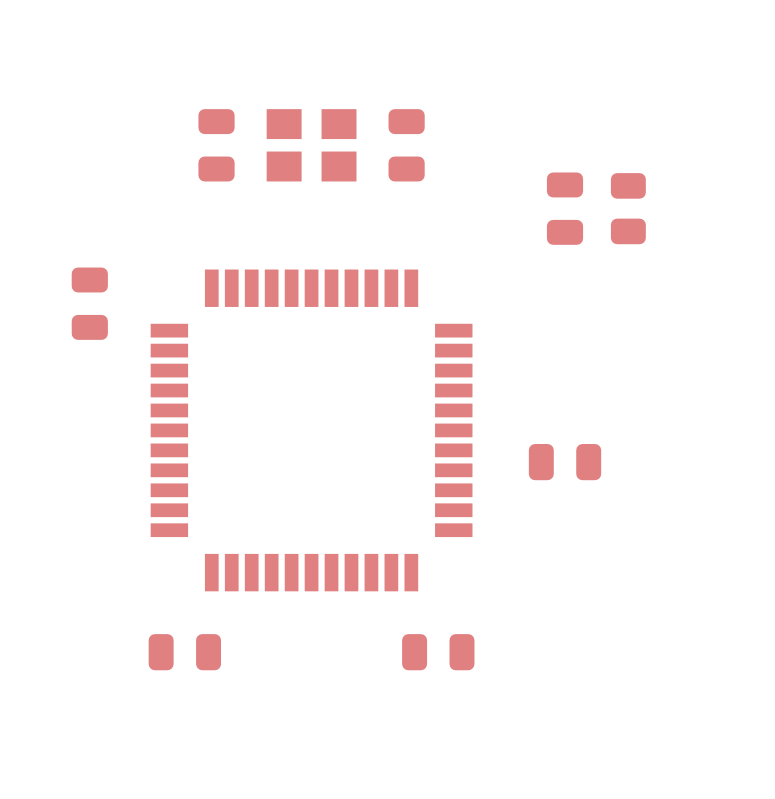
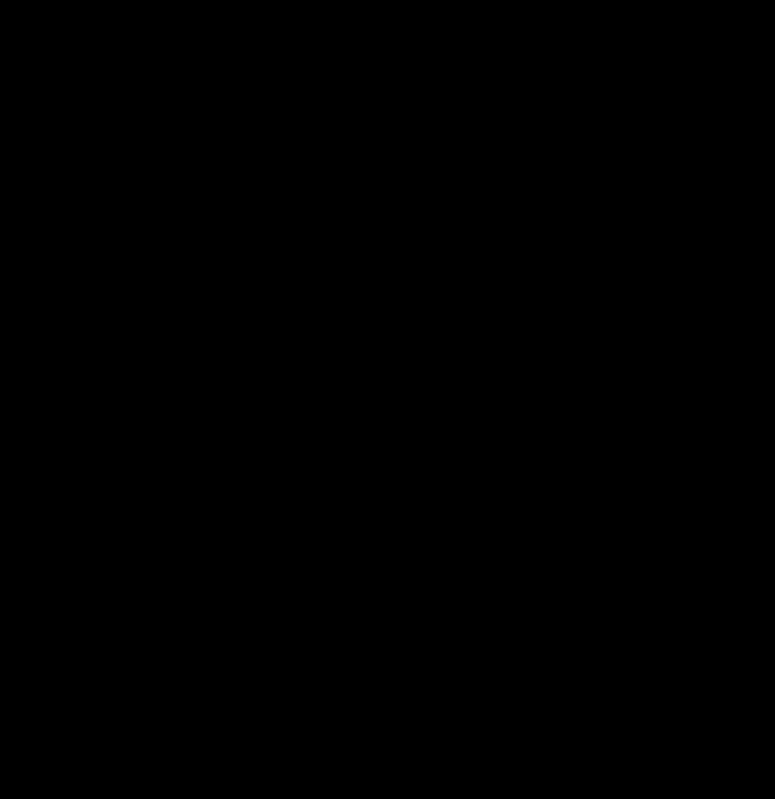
part: (216, 145) -> none
part: (311, 145) -> none
part: (406, 145) -> none
part: (565, 208) -> none
part: (628, 208) -> none
part: (89, 303) -> none
part: (311, 430) -> none
part: (565, 462) -> none
part: (184, 652) -> none
part: (438, 652) -> none

